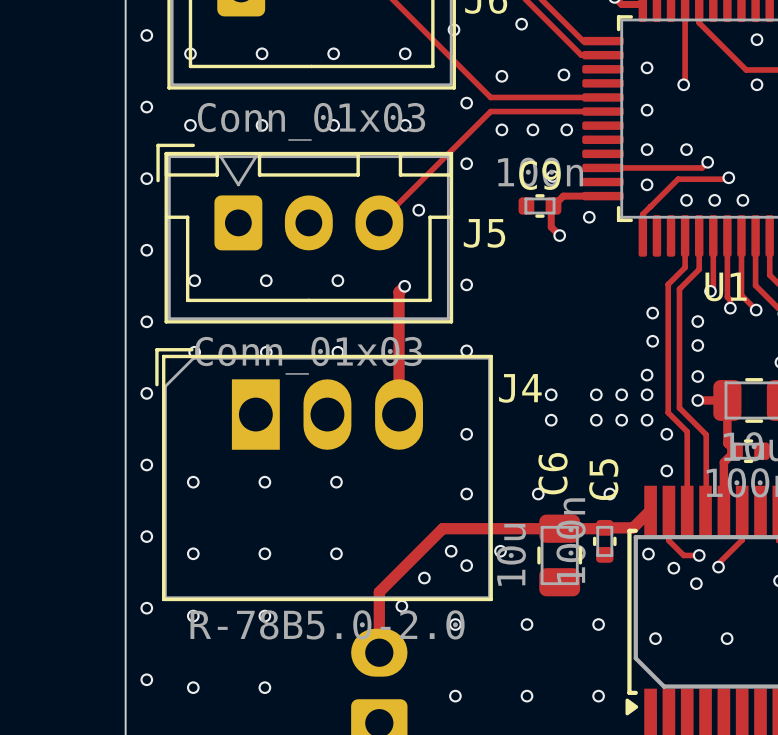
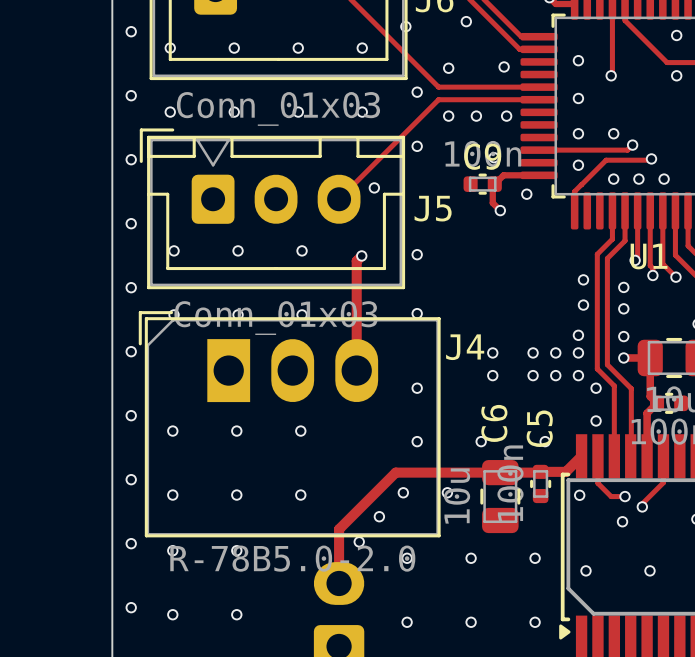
via: (466, 565) -> none
via: (673, 568) -> none

